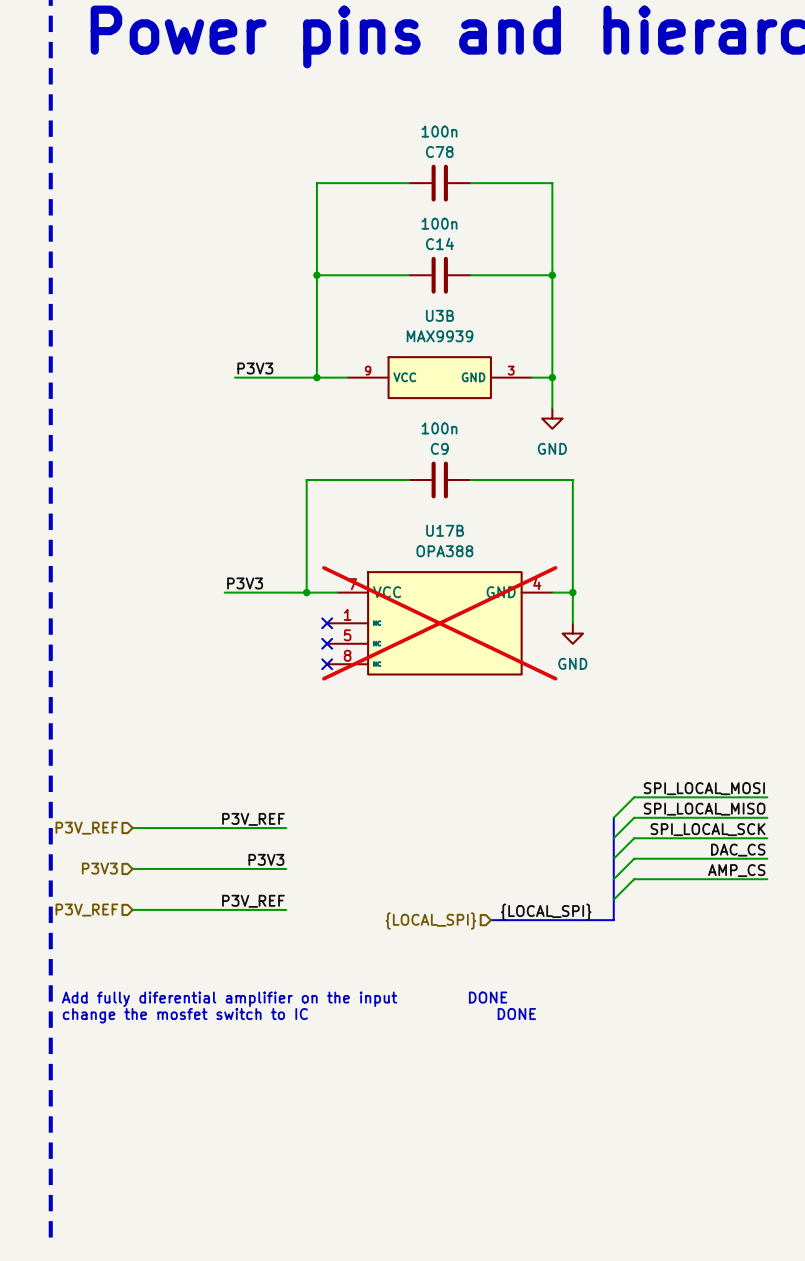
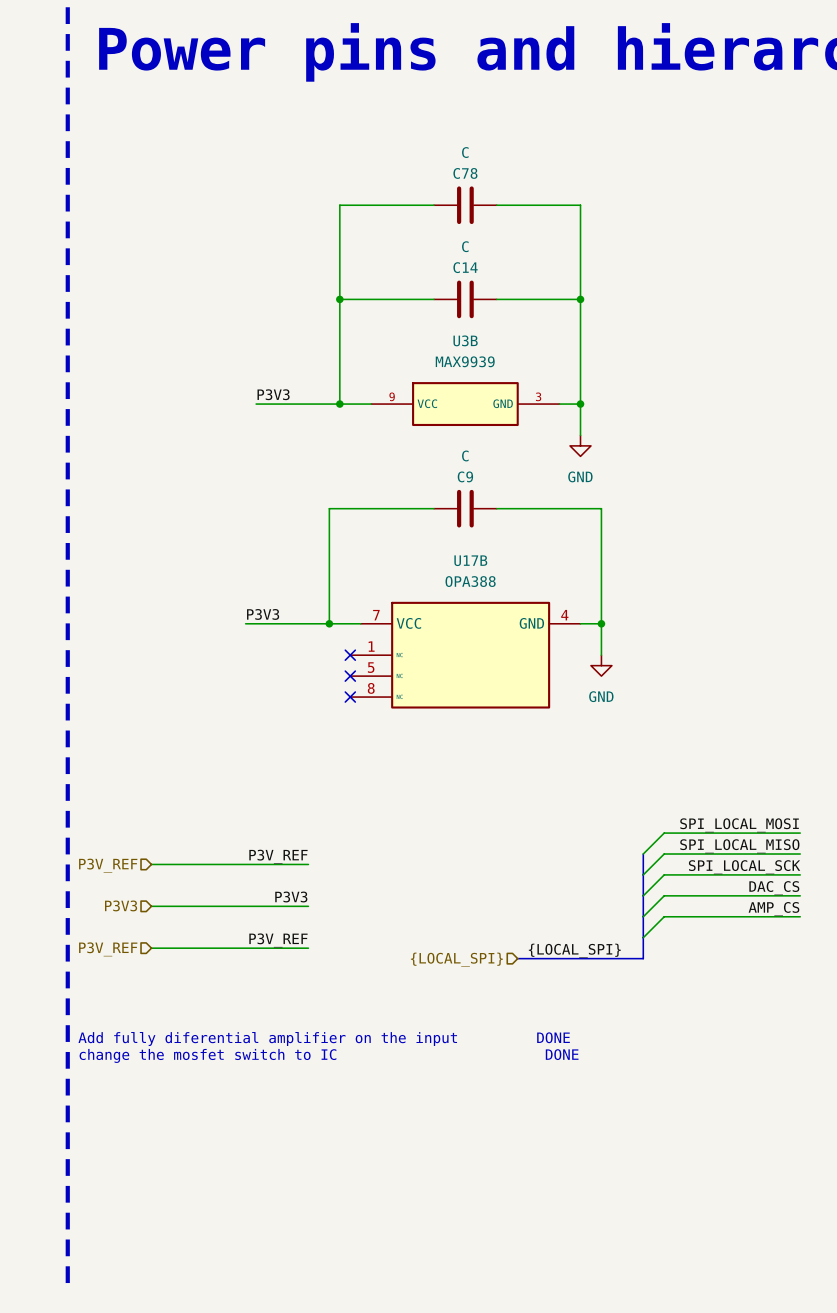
C78 value: 100n (439, 131) -> C (465, 152)
C14 value: 100n (439, 223) -> C (465, 246)
C9 value: 100n (439, 428) -> C (465, 455)
U17B do-not-place cross: (439, 623) -> none

